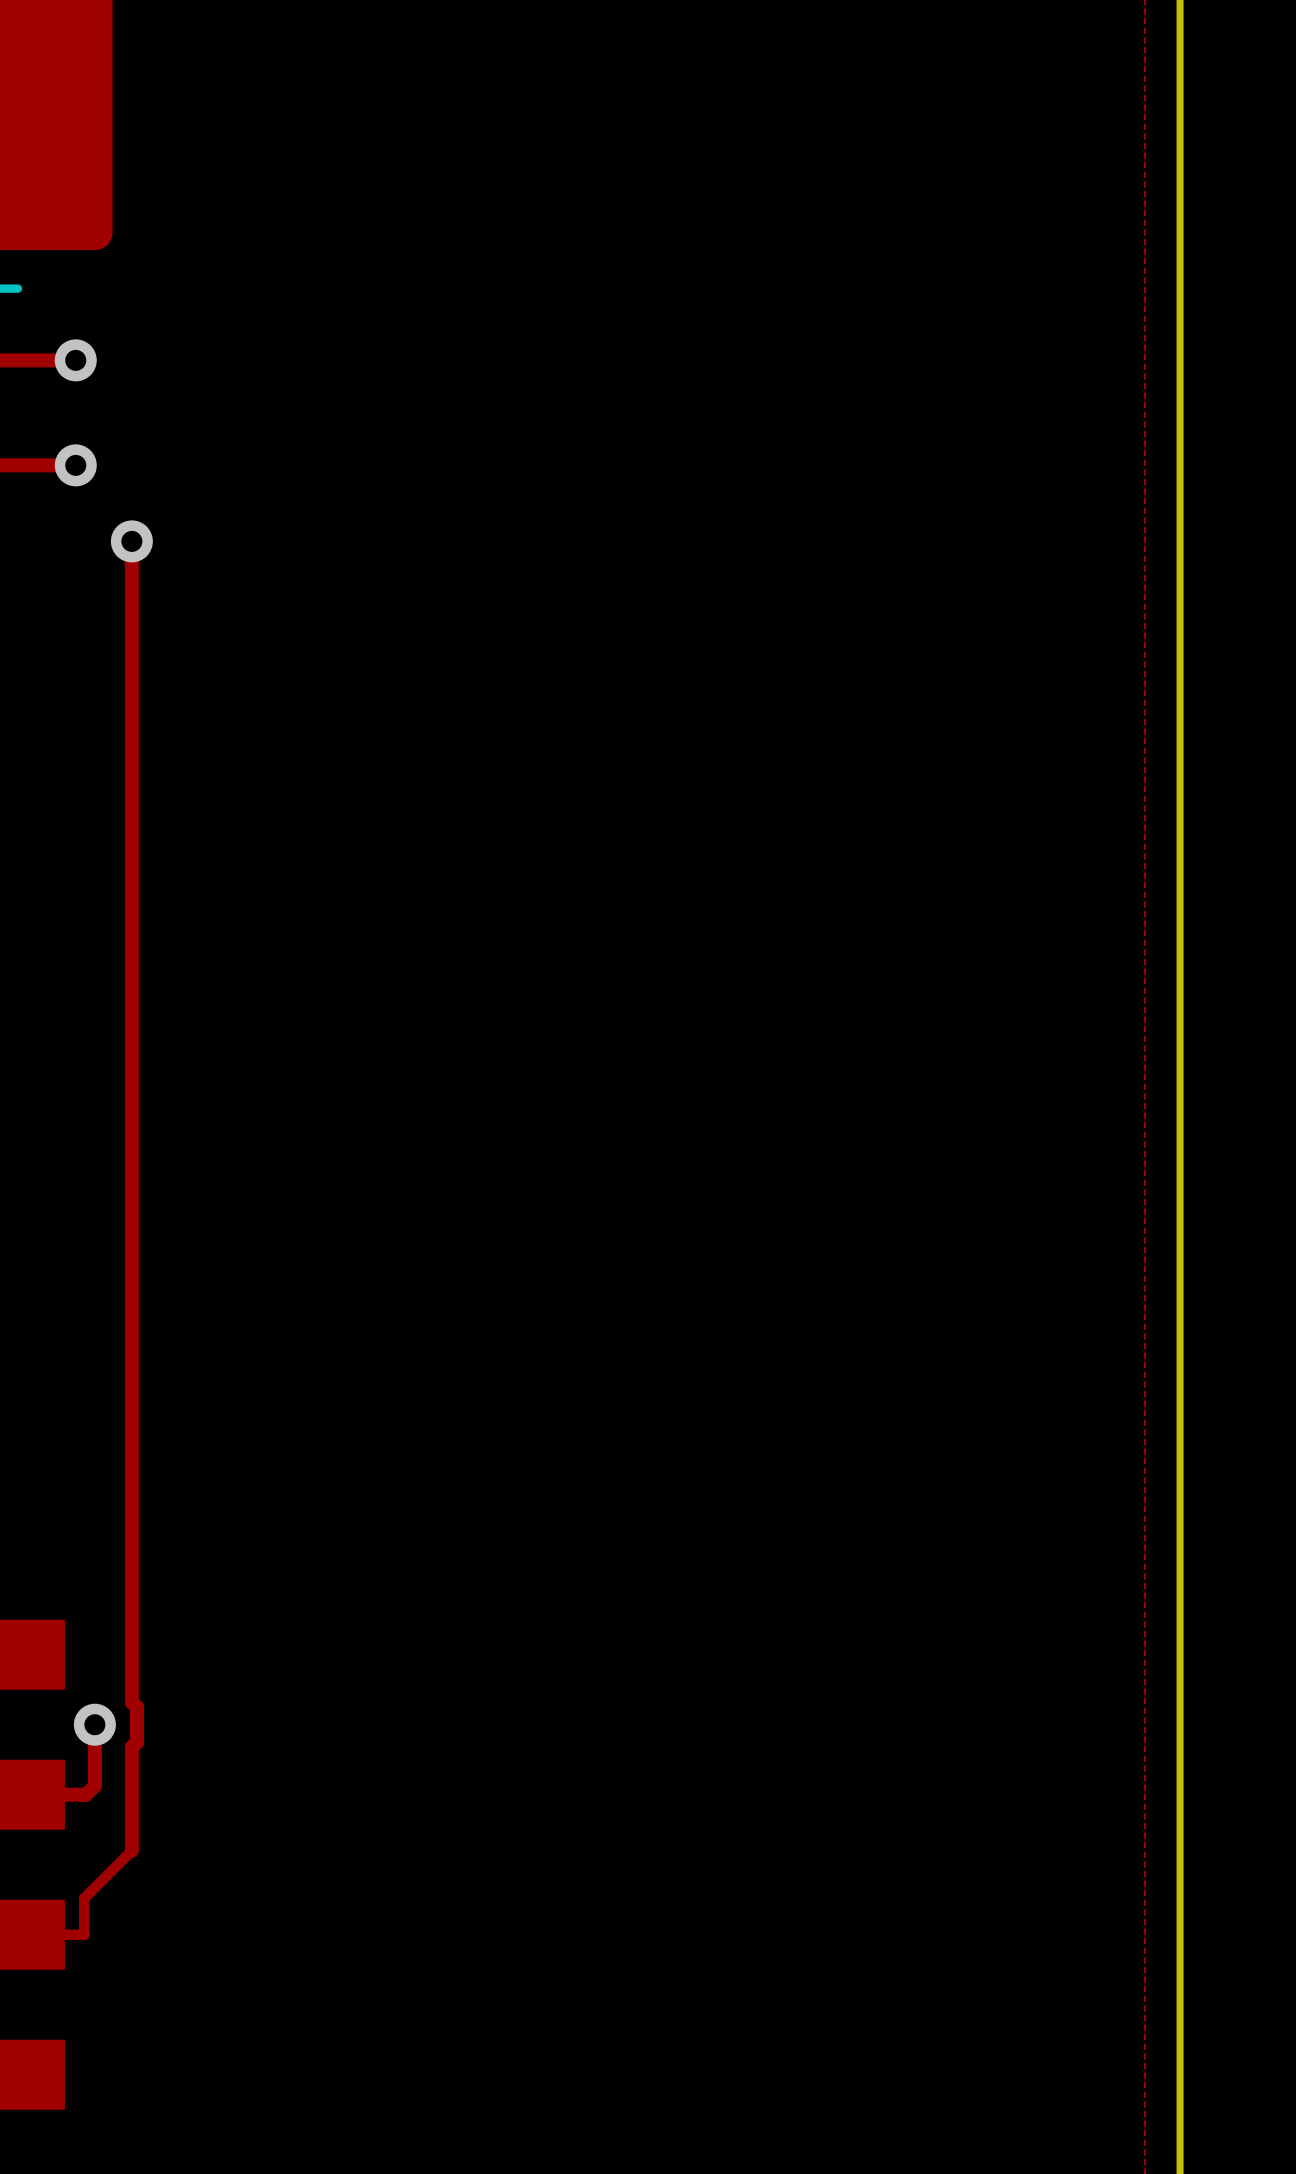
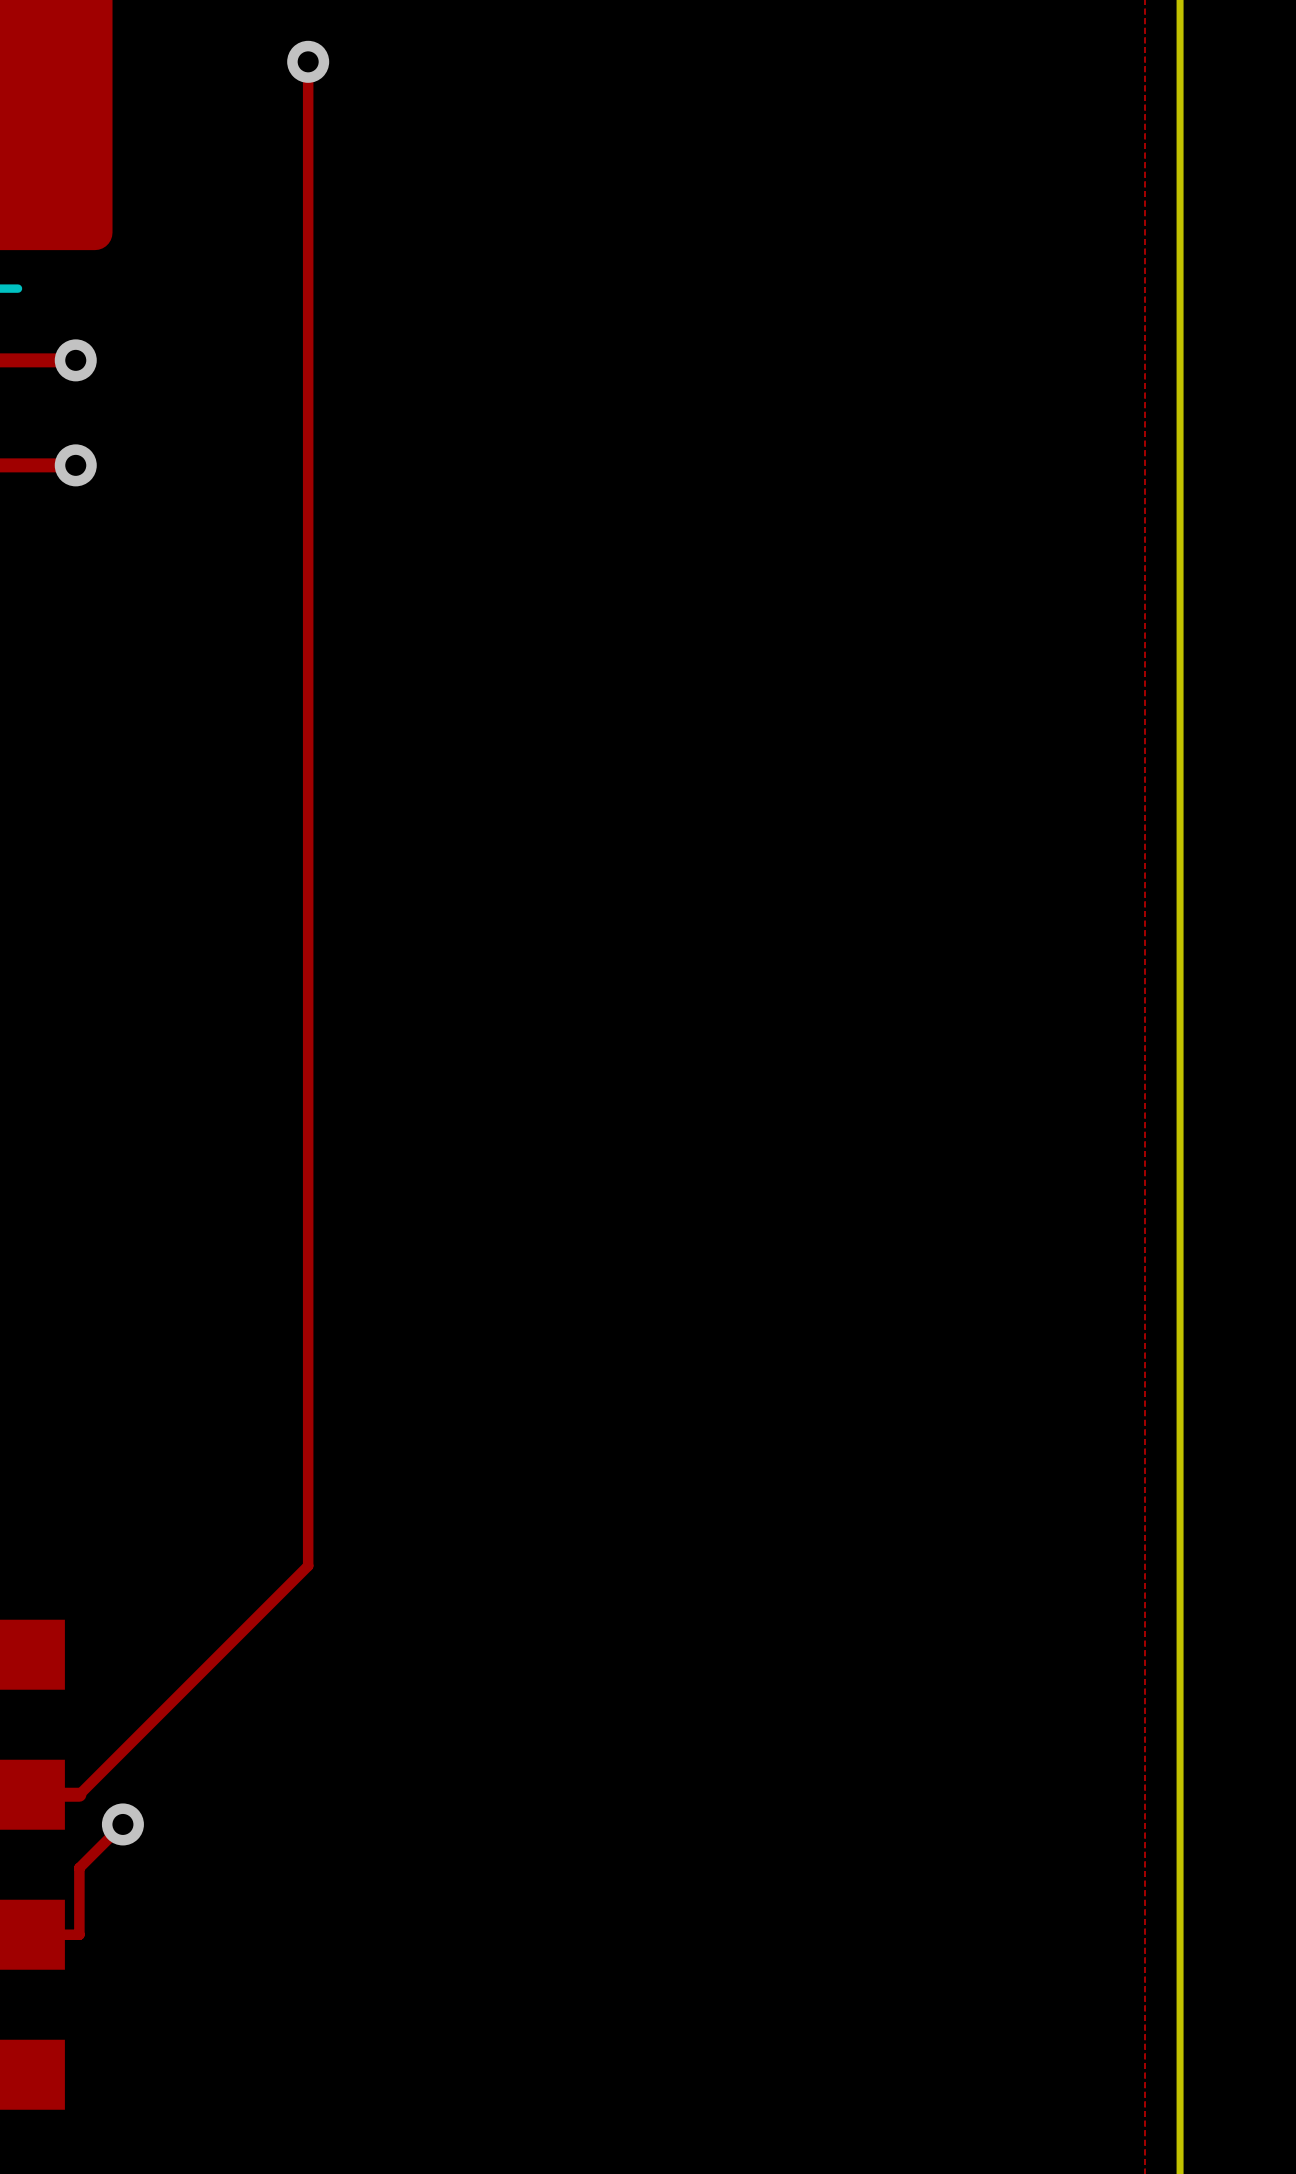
via: none -> (308, 61)
track: (131, 541) (131, 1702) (137, 1707) (137, 1742) (131, 1747) (131, 1850) (84, 1898) (84, 1934) (79, 1934) -> (122, 1824) (79, 1868) (79, 1934)
via: (131, 541) -> none
track: (94, 1724) (94, 1785) (86, 1794) (79, 1794) -> (308, 61) (308, 1565) (79, 1794)
via position: (94, 1724) -> (122, 1824)

